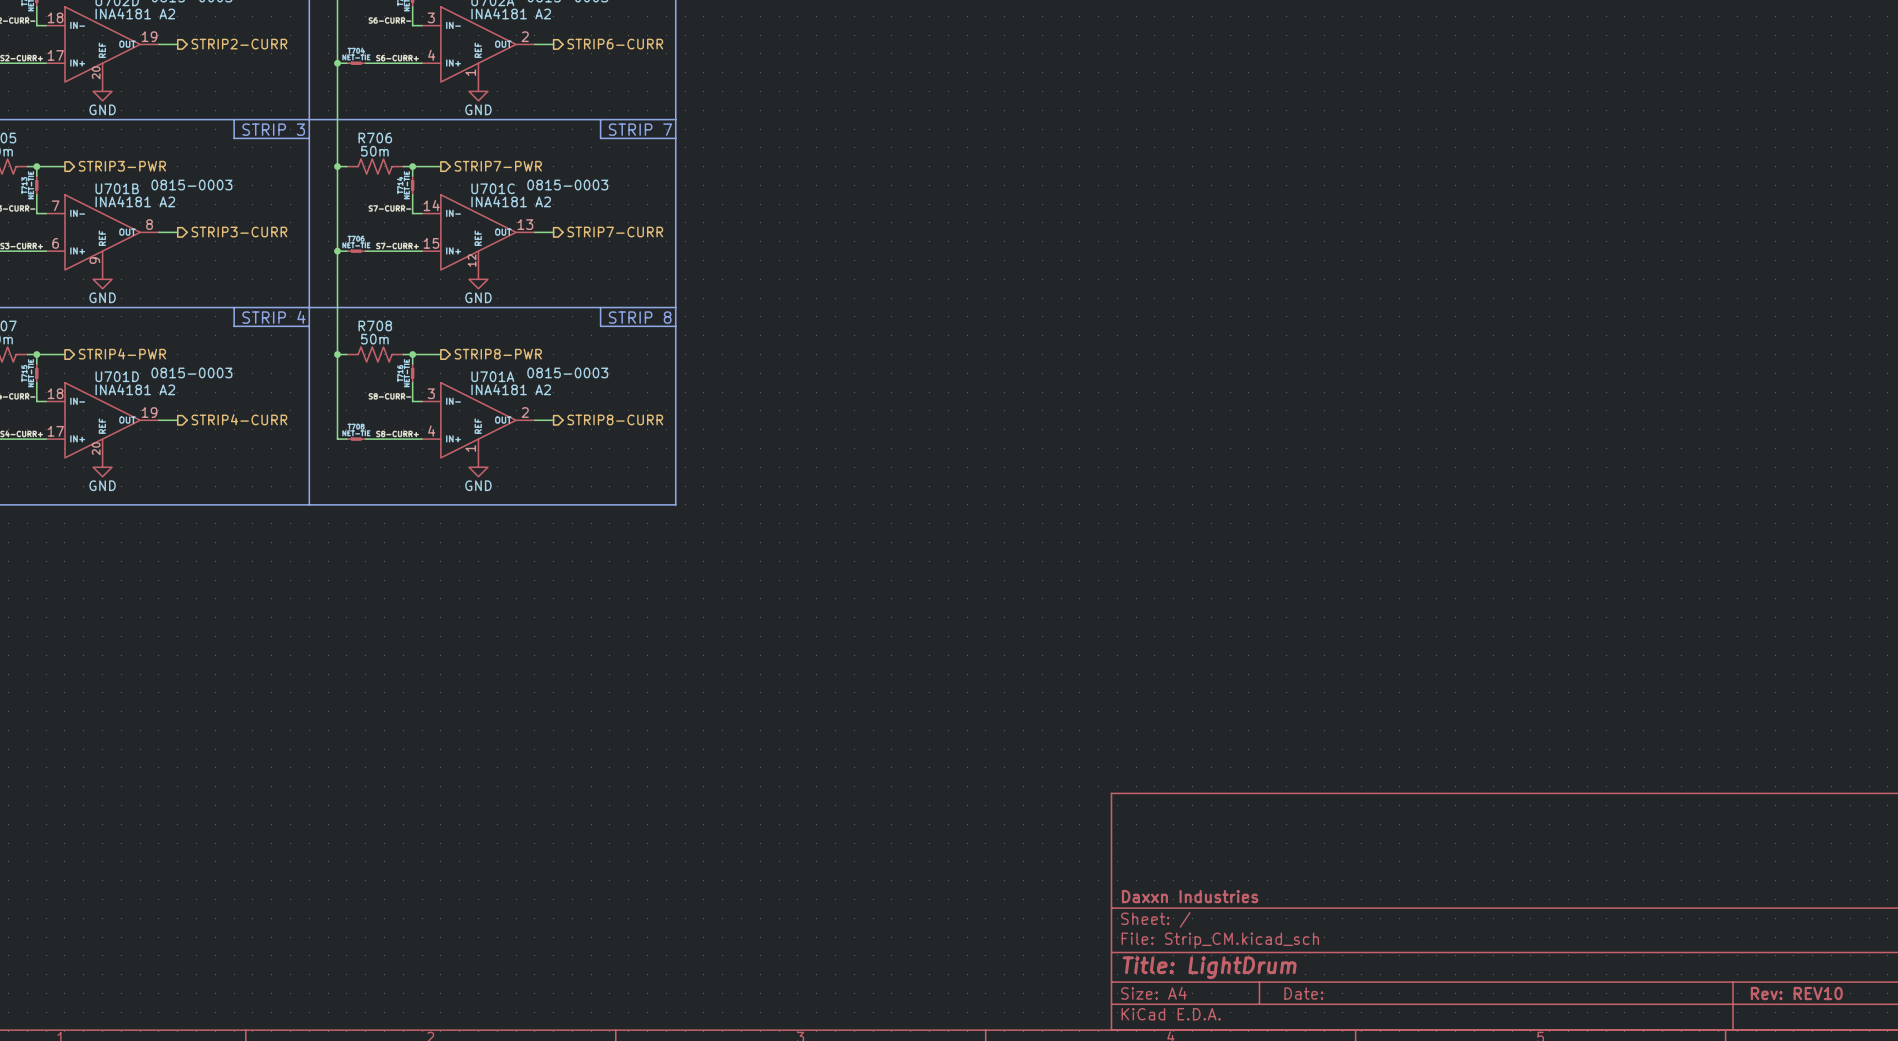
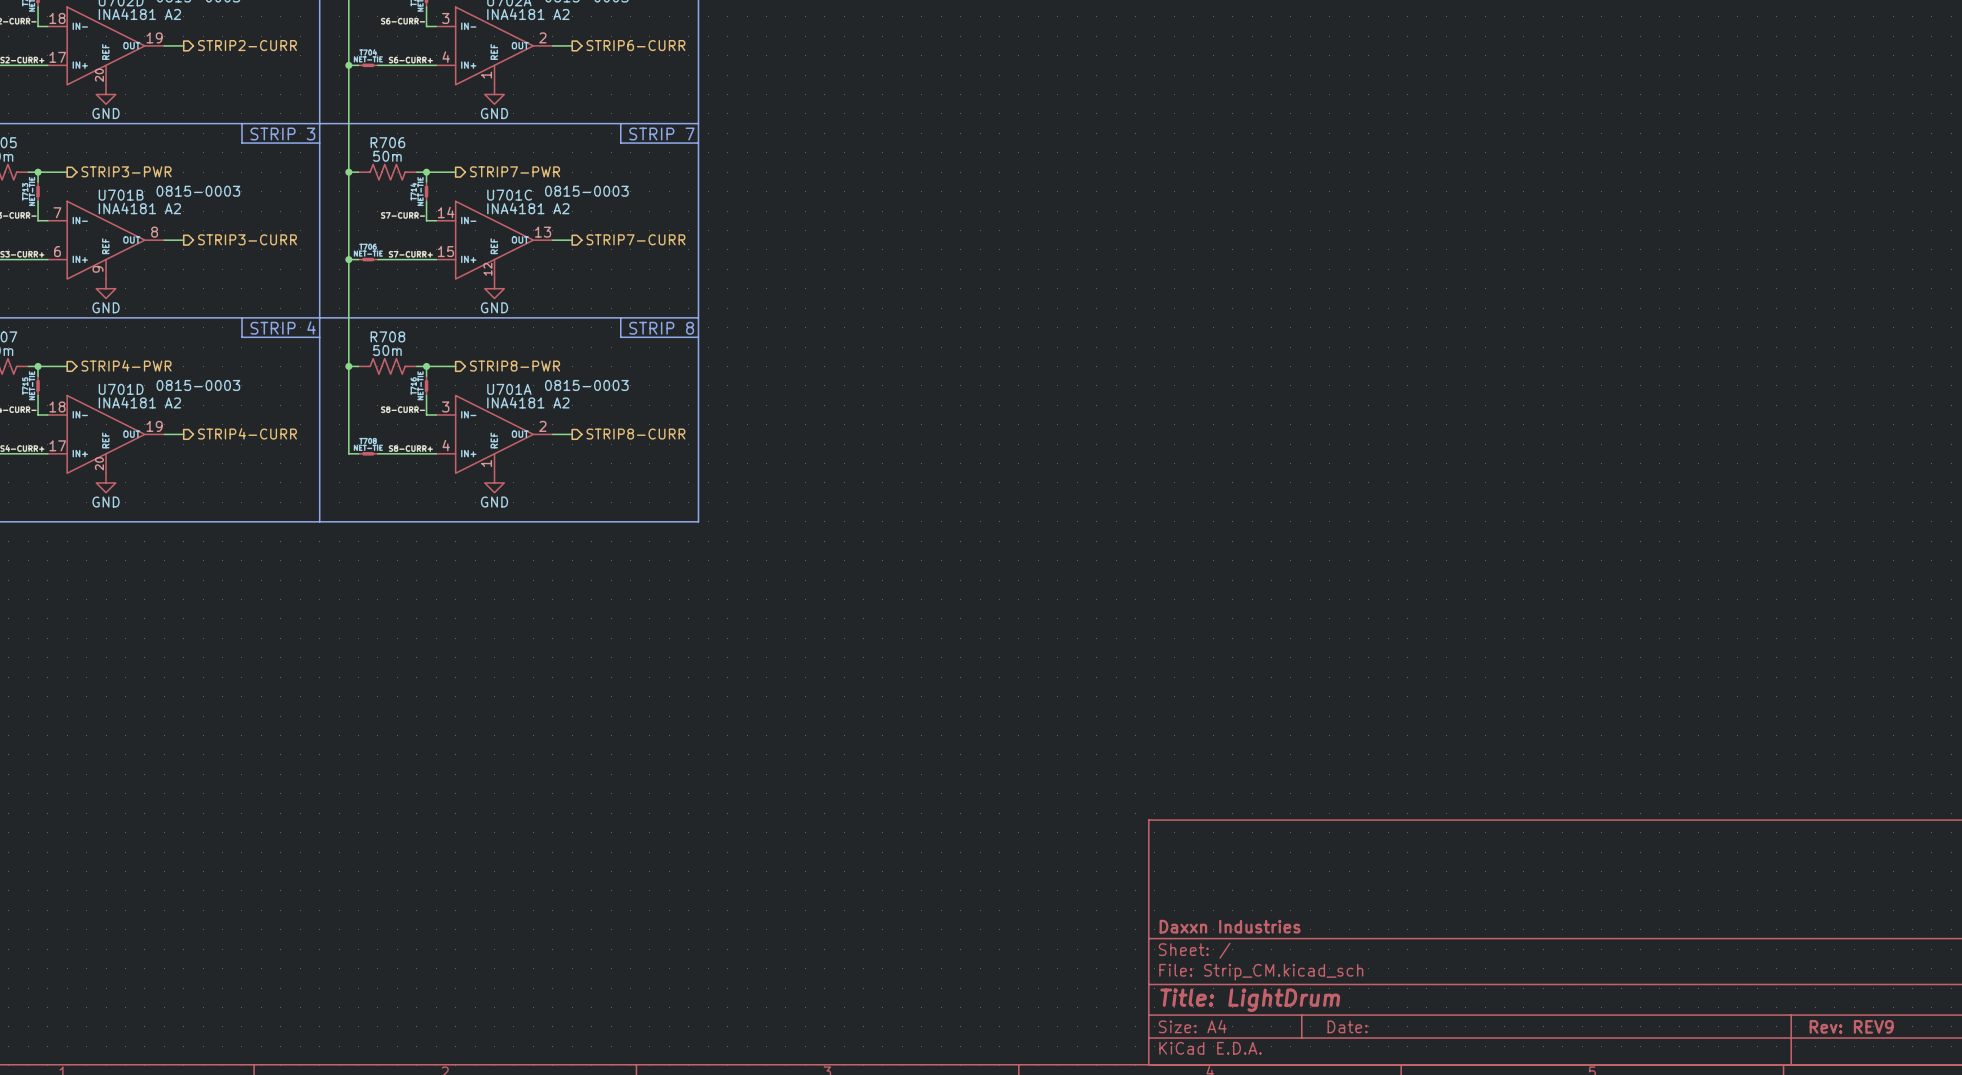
title block: Rev: REV10 (1796, 993) -> Rev: REV9 (1851, 1026)

